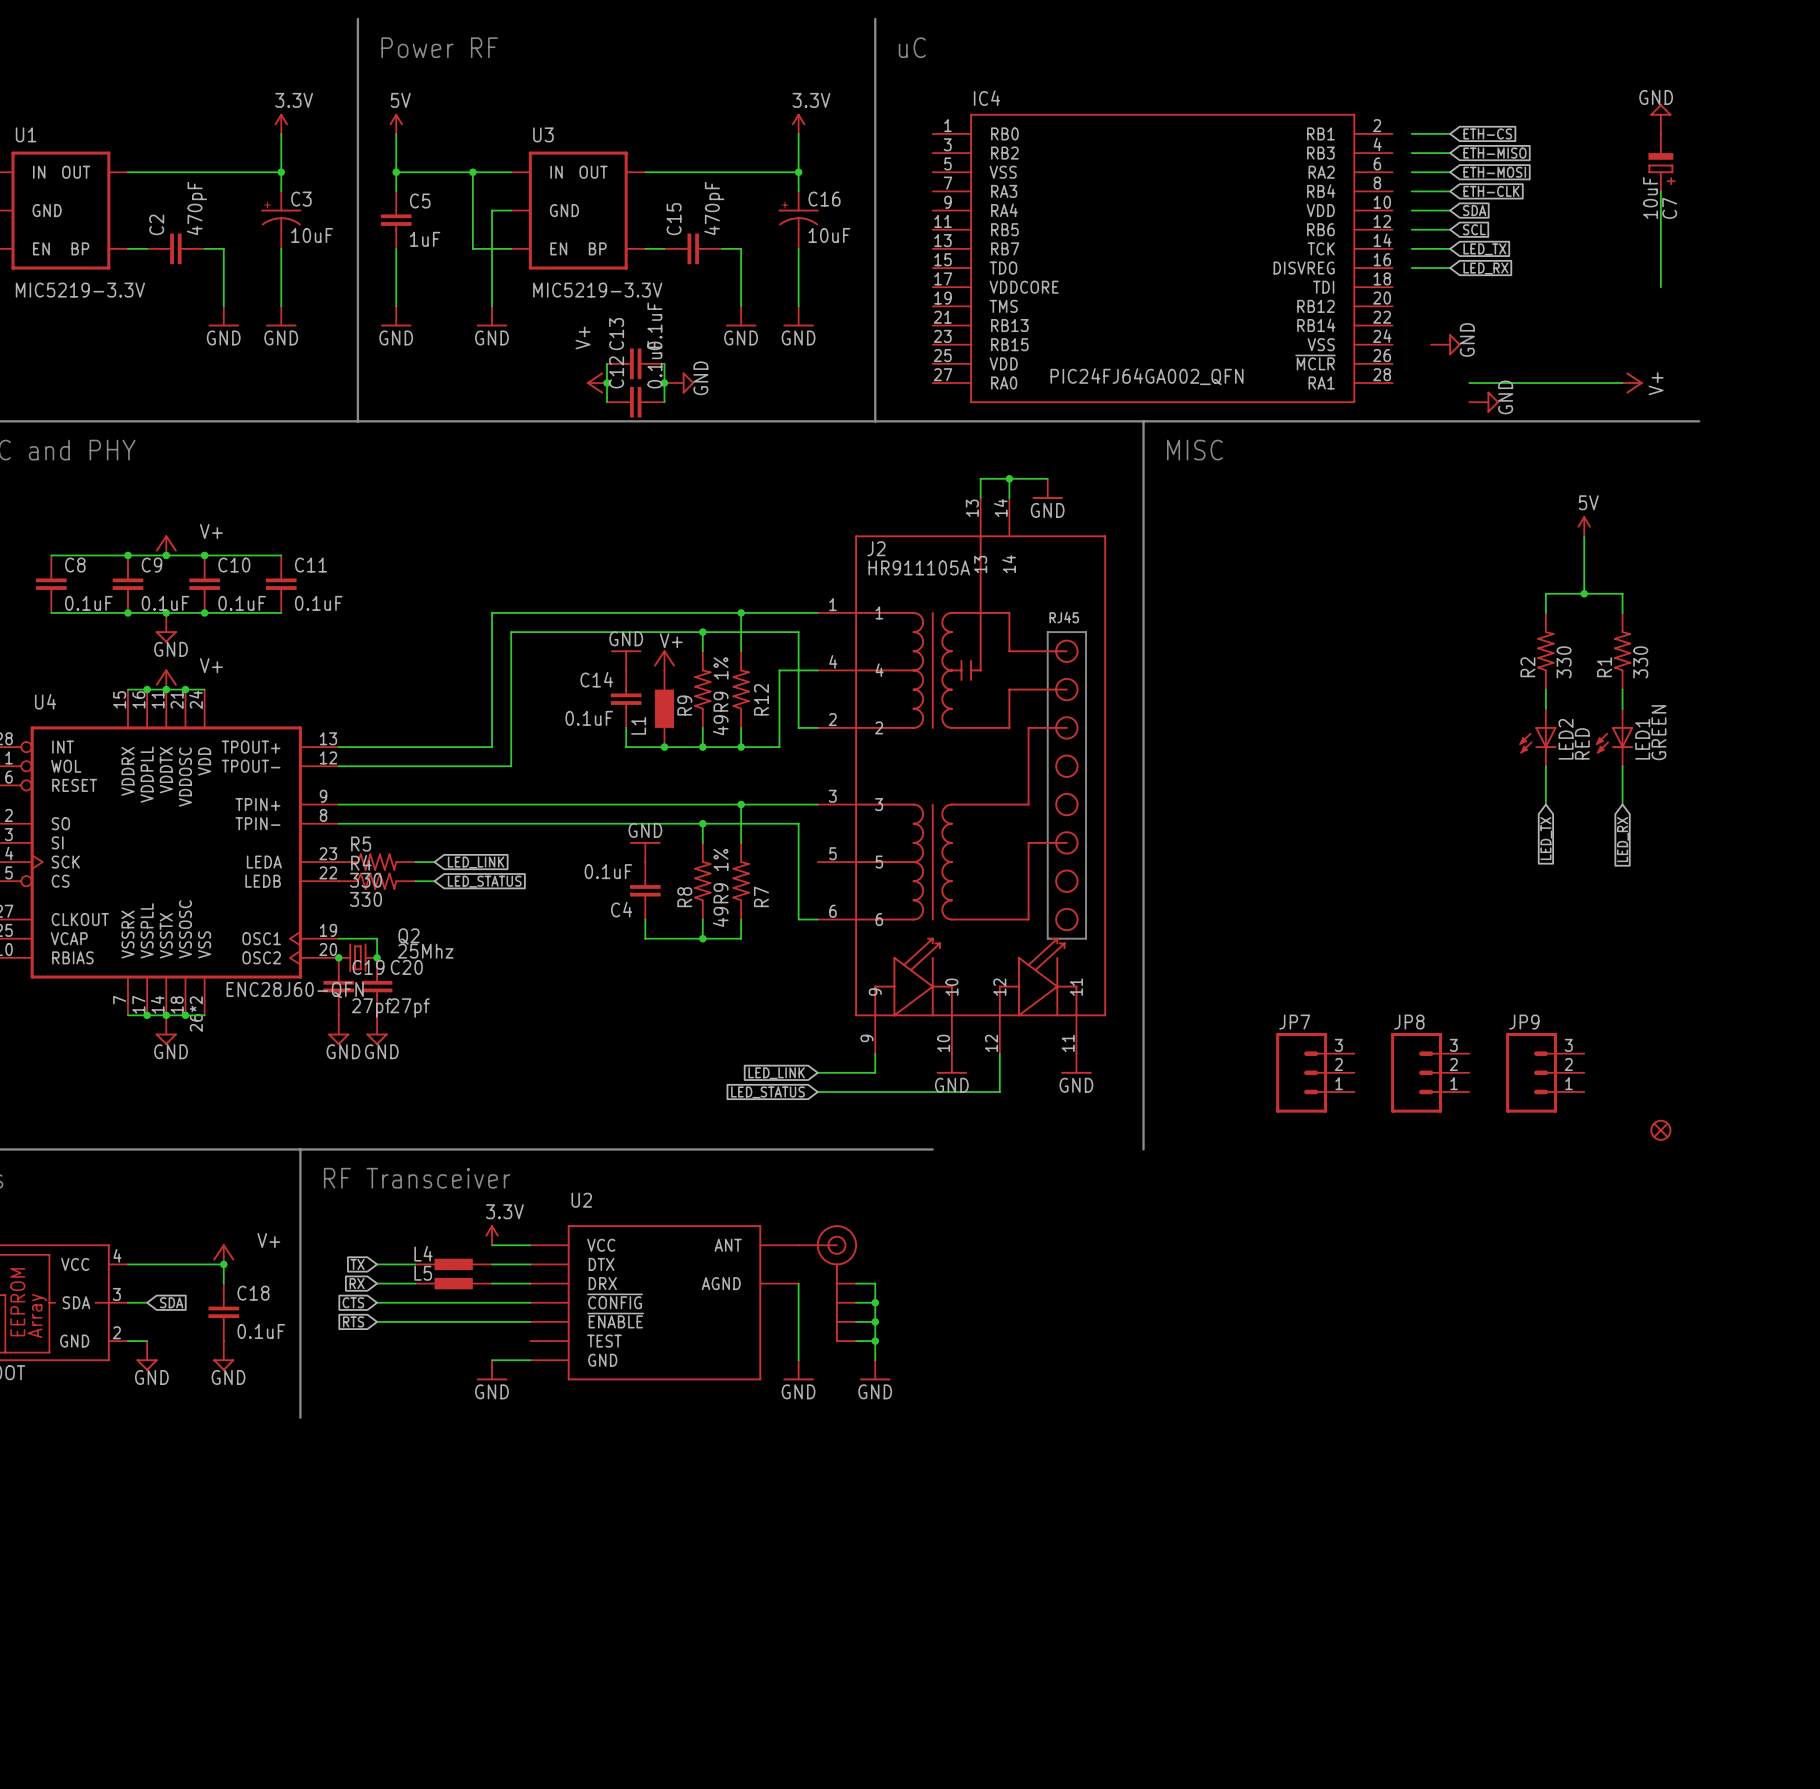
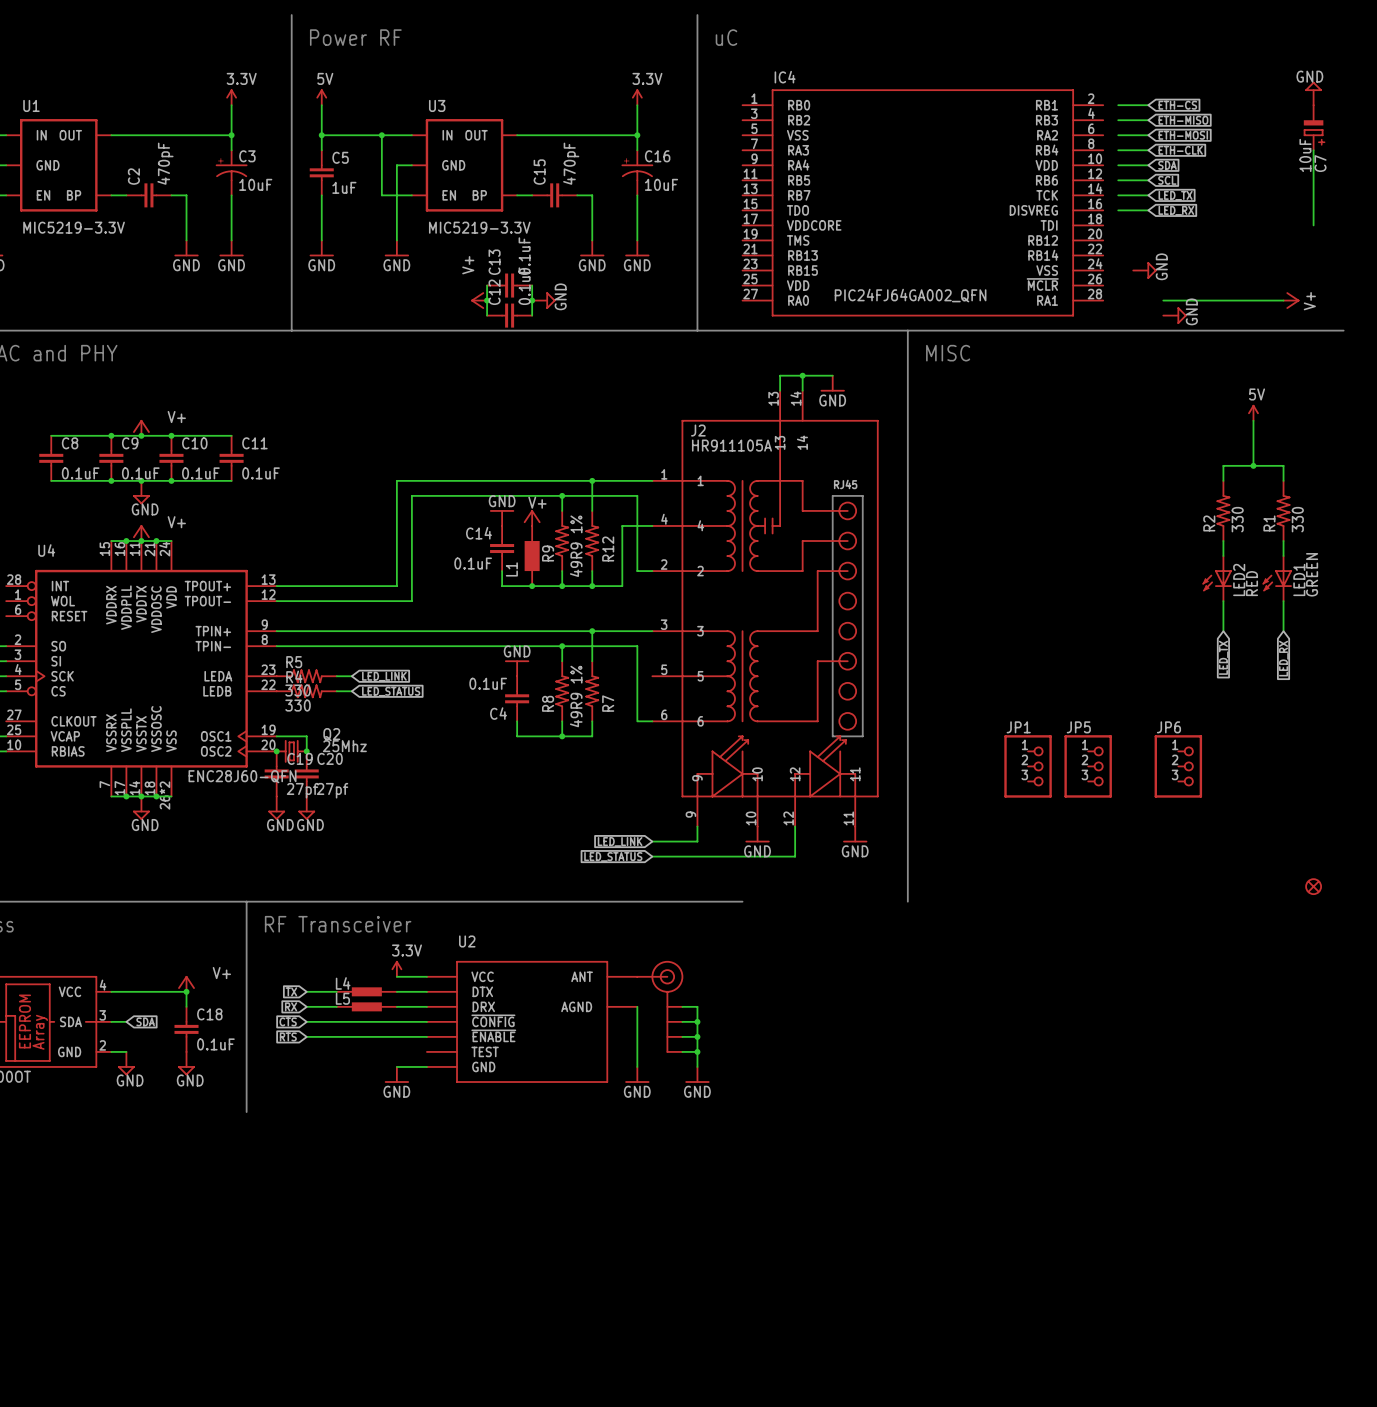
JP1: none -> (1028, 766)
JP5: none -> (1088, 766)
JP6: none -> (1178, 766)
JP7: (1315, 1072) -> none
JP8: (1430, 1072) -> none
JP9: (1545, 1072) -> none

